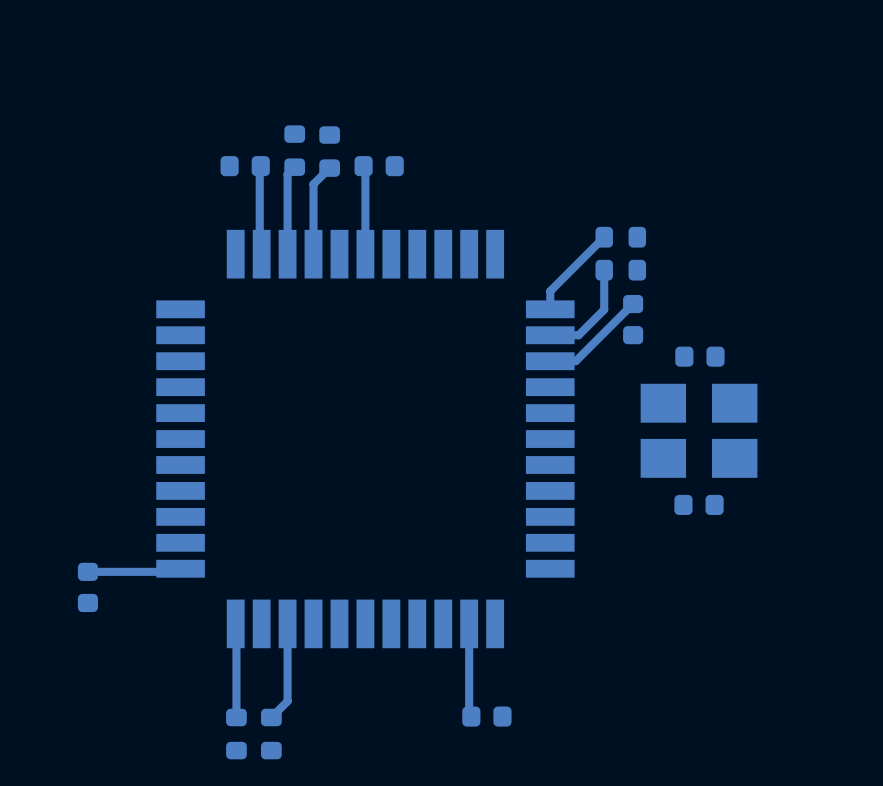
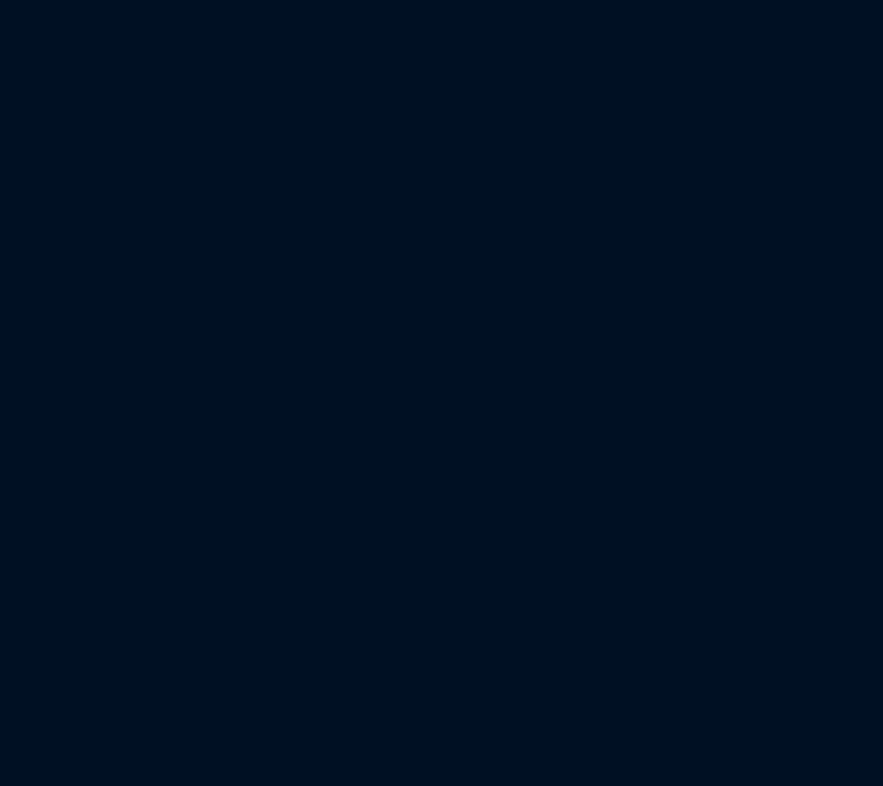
part: (294, 150) -> none
part: (329, 151) -> none
bottom track: (259, 163) (259, 252) (261, 254) -> none
part: (245, 166) -> none
bottom track: (363, 166) (365, 167) (365, 254) -> none
part: (379, 166) -> none
bottom track: (294, 167) (287, 174) (287, 254) -> none
bottom track: (329, 168) (313, 184) (313, 254) -> none
bottom track: (604, 237) (550, 291) (550, 309) -> none
part: (620, 237) -> none
bottom track: (604, 270) (604, 309) (578, 335) (550, 335) -> none
part: (620, 270) -> none
bottom track: (632, 304) (575, 361) (550, 361) (552, 359) -> none
part: (633, 319) -> none
part: (699, 356) -> none
part: (699, 430) -> none
part: (365, 439) -> none
part: (699, 504) -> none
bottom track: (180, 568) (177, 571) (87, 571) -> none
part: (87, 587) -> none
bottom track: (235, 623) (236, 717) -> none
bottom track: (287, 623) (287, 701) (271, 717) -> none
bottom track: (469, 623) (469, 714) (474, 719) -> none
part: (486, 716) -> none
part: (236, 734) -> none
part: (271, 734) -> none

